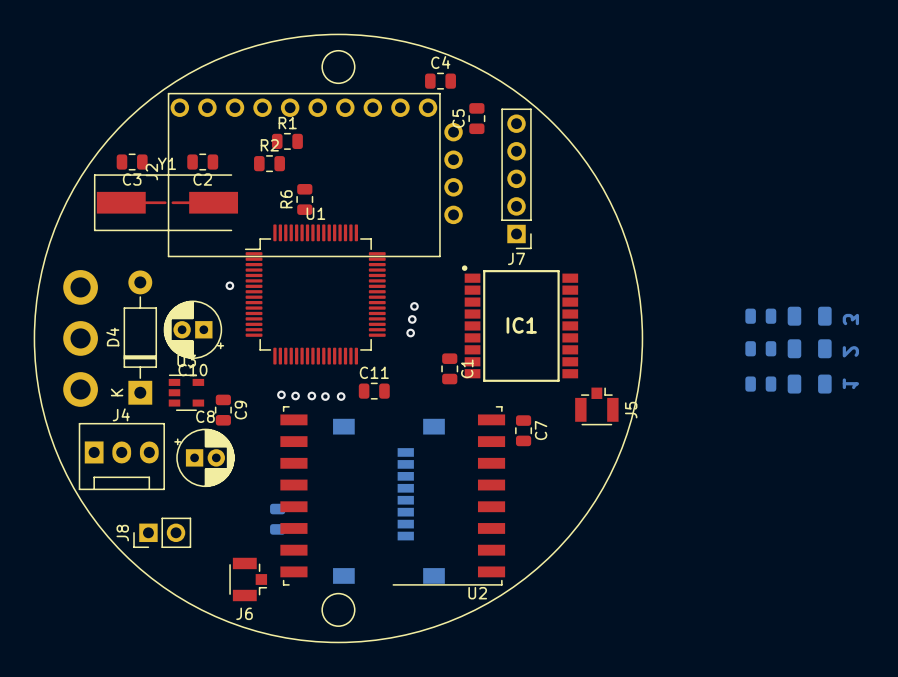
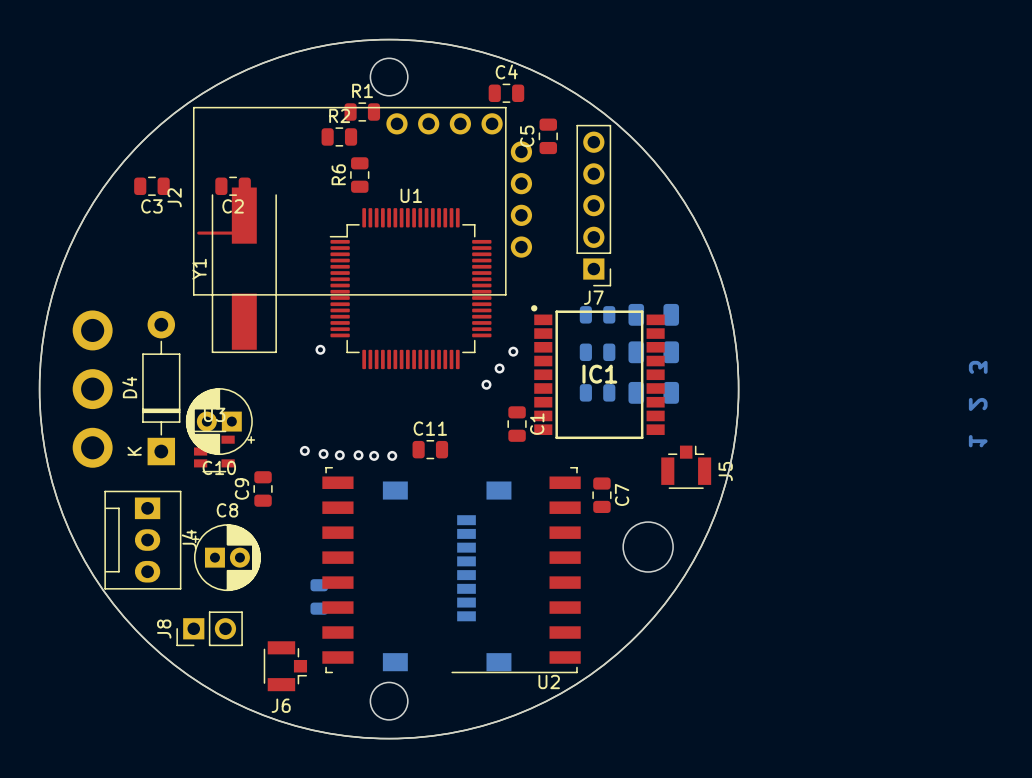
round board edge: none -> [38, 38, 740, 740]
drawing: [321, 50, 356, 84] -> none
round board edge: none -> [369, 57, 409, 97]
J2 footprint: [167, 92, 441, 258] -> [193, 106, 507, 296]
R1 position: (287, 141) -> (362, 111)
R2 position: (269, 163) -> (339, 136)
R6 position: (304, 199) -> (359, 175)
top track: (121, 202) (165, 202) -> none
Y1 rotation: 0° (166, 202) -> 90° counterclockwise (244, 270)
part: none -> (597, 314)
part: none -> (653, 314)
via position: (229, 285) -> (320, 349)
U1 position: (315, 294) -> (410, 288)
via: none -> (513, 351)
via: (414, 306) -> none
part: none -> (597, 352)
part: none -> (653, 352)
part: (760, 316) -> none
part: (809, 316) -> none
via: (412, 319) -> none
via: none -> (499, 368)
C10 position: (193, 329) -> (220, 421)
via: (410, 333) -> none
via: none -> (486, 384)
part: none -> (597, 392)
part: none -> (653, 392)
part: (760, 348) -> none
part: (809, 348) -> none
part: (760, 384) -> none
part: (809, 384) -> none
via: none -> (304, 450)
C9 position: (223, 410) -> (263, 488)
C9 name position: C9 (240, 410) -> C9 (241, 488)
round board edge: none -> [622, 521, 674, 573]
J4 rotation: 0° (121, 456) -> 90° clockwise (142, 540)
C8 position: (204, 457) -> (226, 557)
J8 position: (162, 532) -> (209, 628)
drawing: [321, 592, 356, 627] -> none
round board edge: none -> [369, 681, 409, 721]

